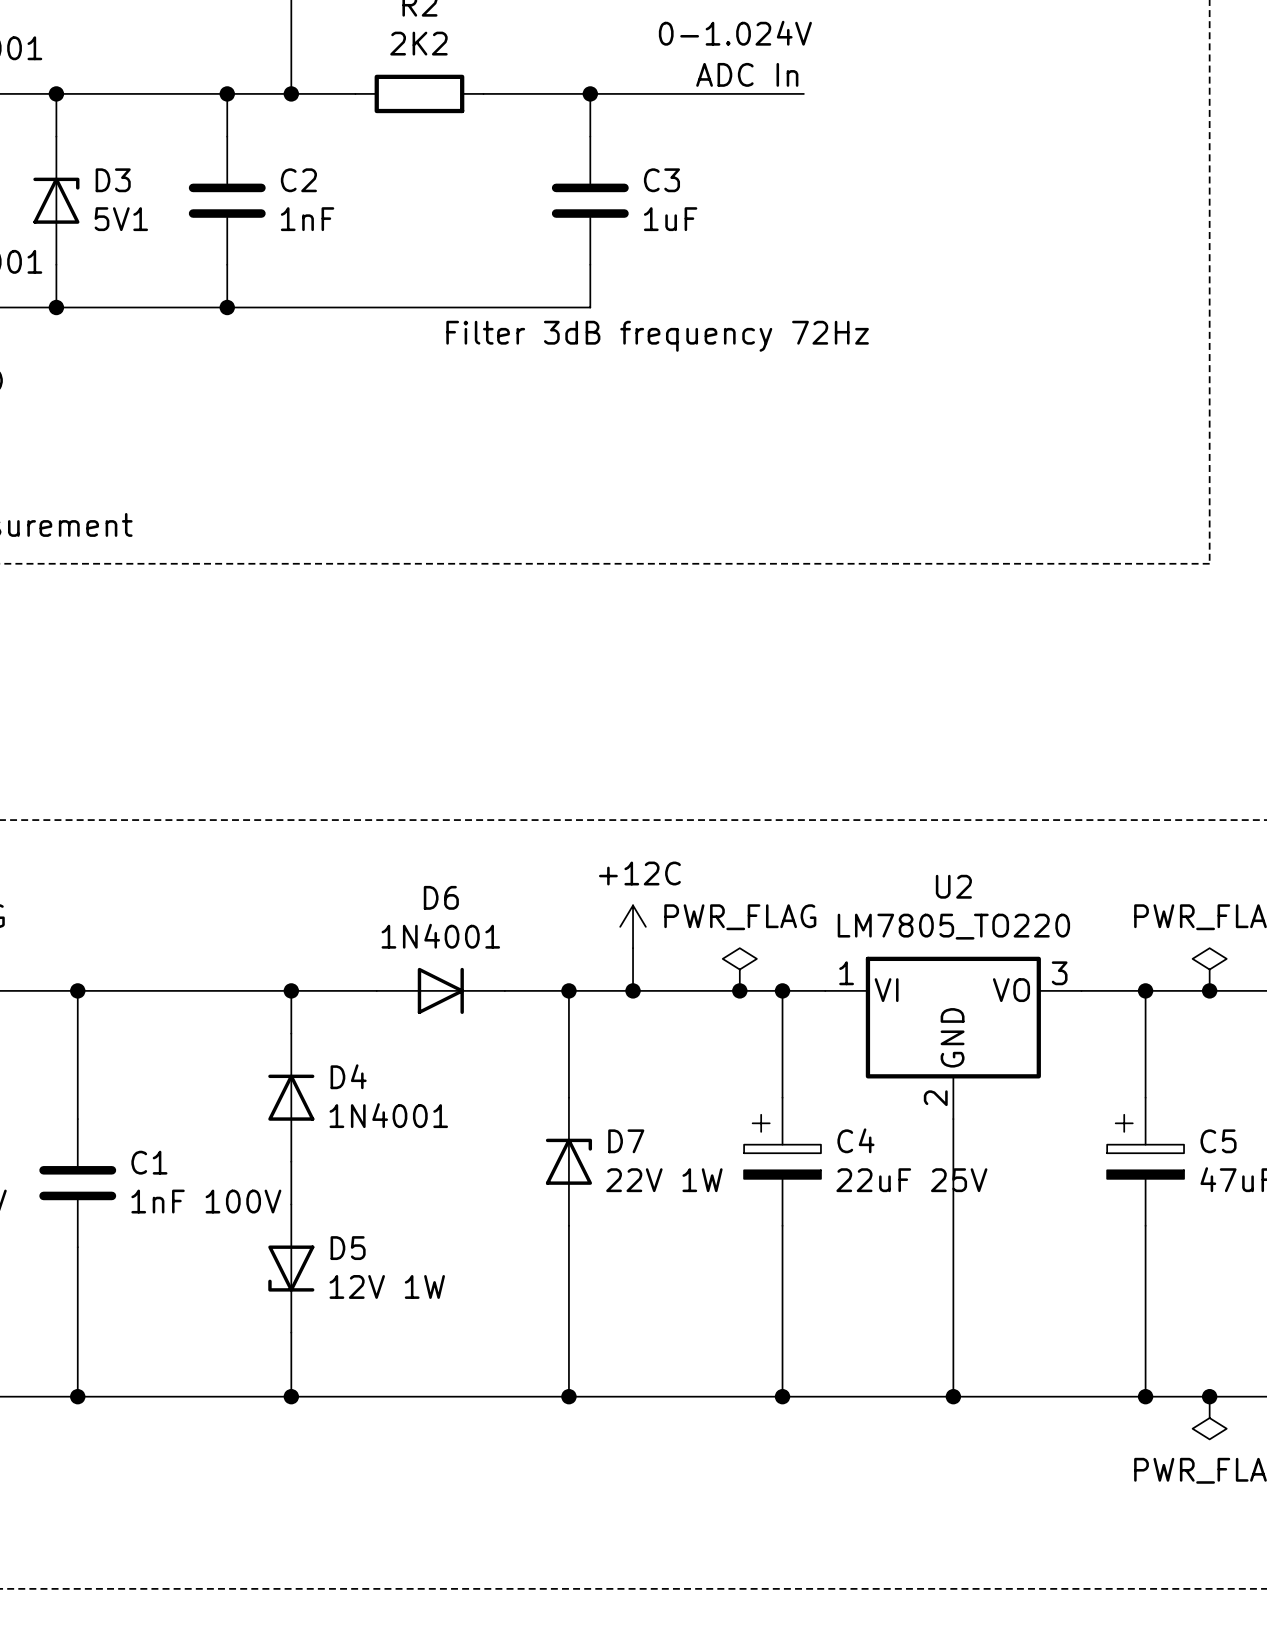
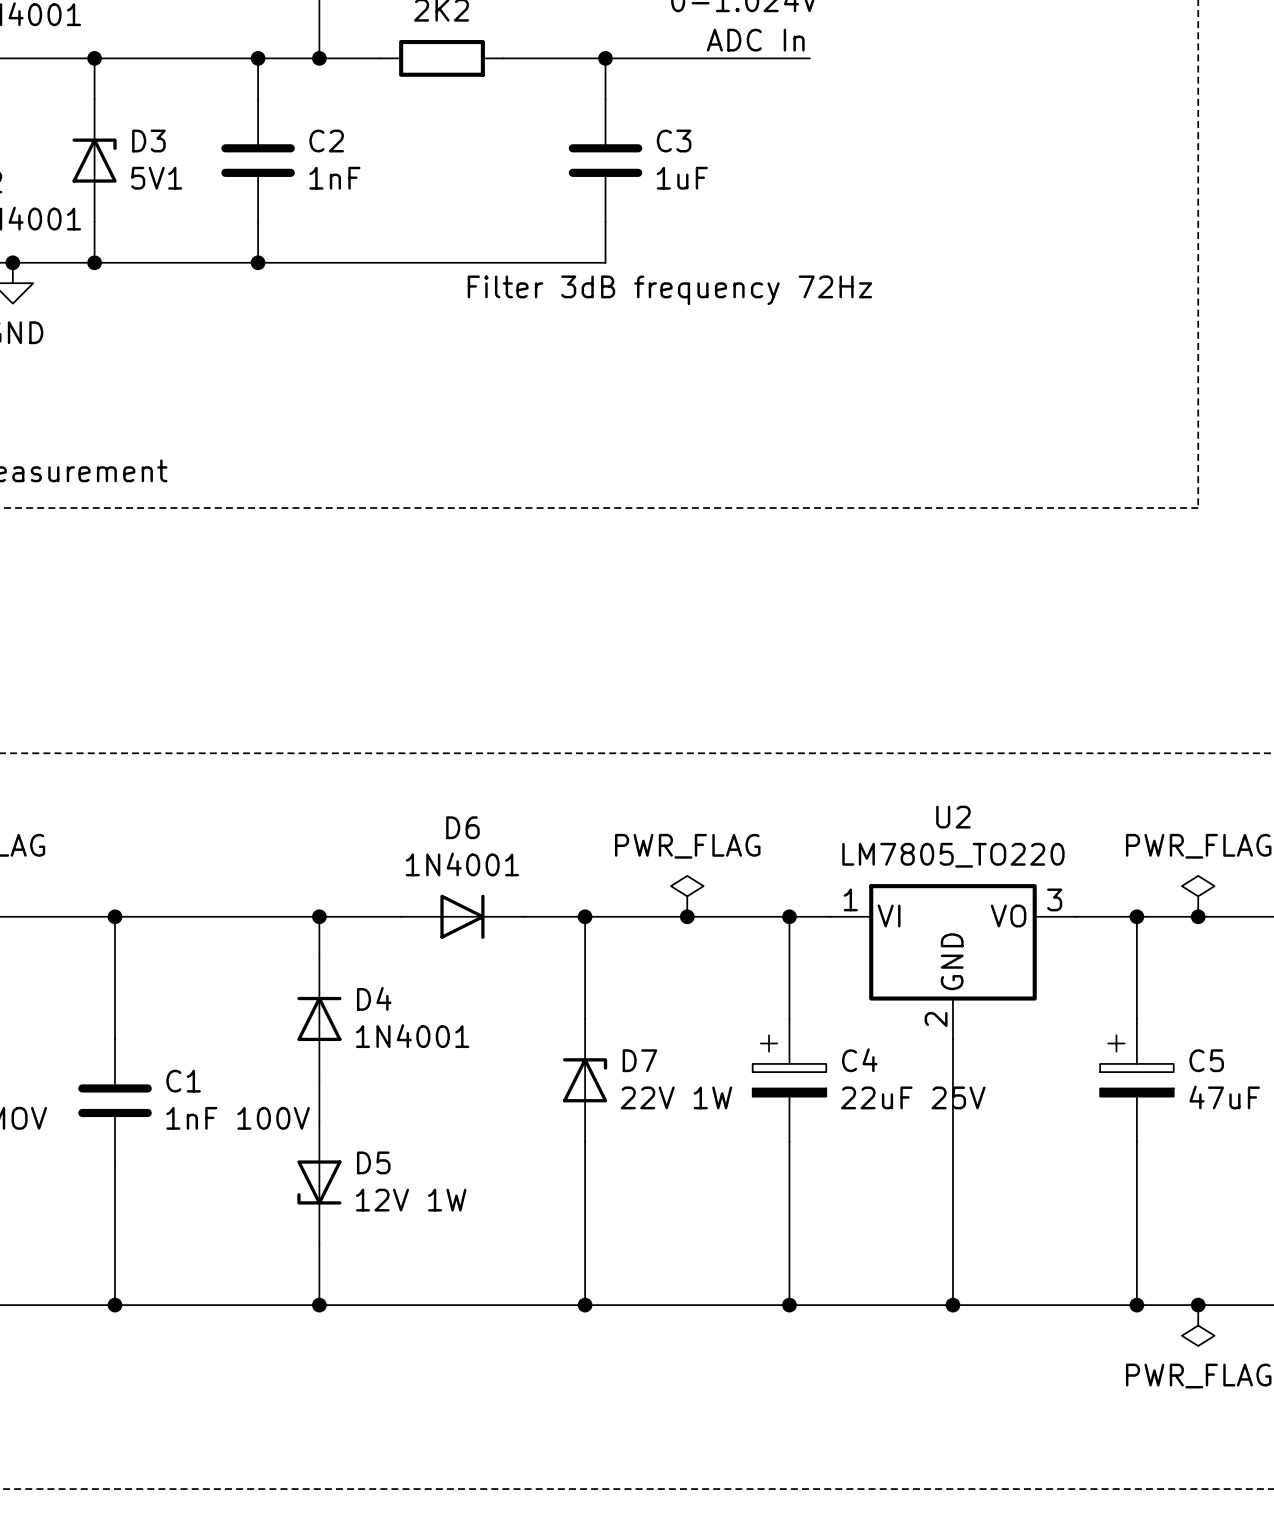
power symbol: +12C (633, 926) -> none
wire: (633, 948) (633, 990) -> none
power symbol position: PWR_FLAG (739, 969) -> PWR_FLAG (687, 896)
junction: (633, 990) -> none
junction: none -> (687, 916)
junction: (739, 990) -> none

